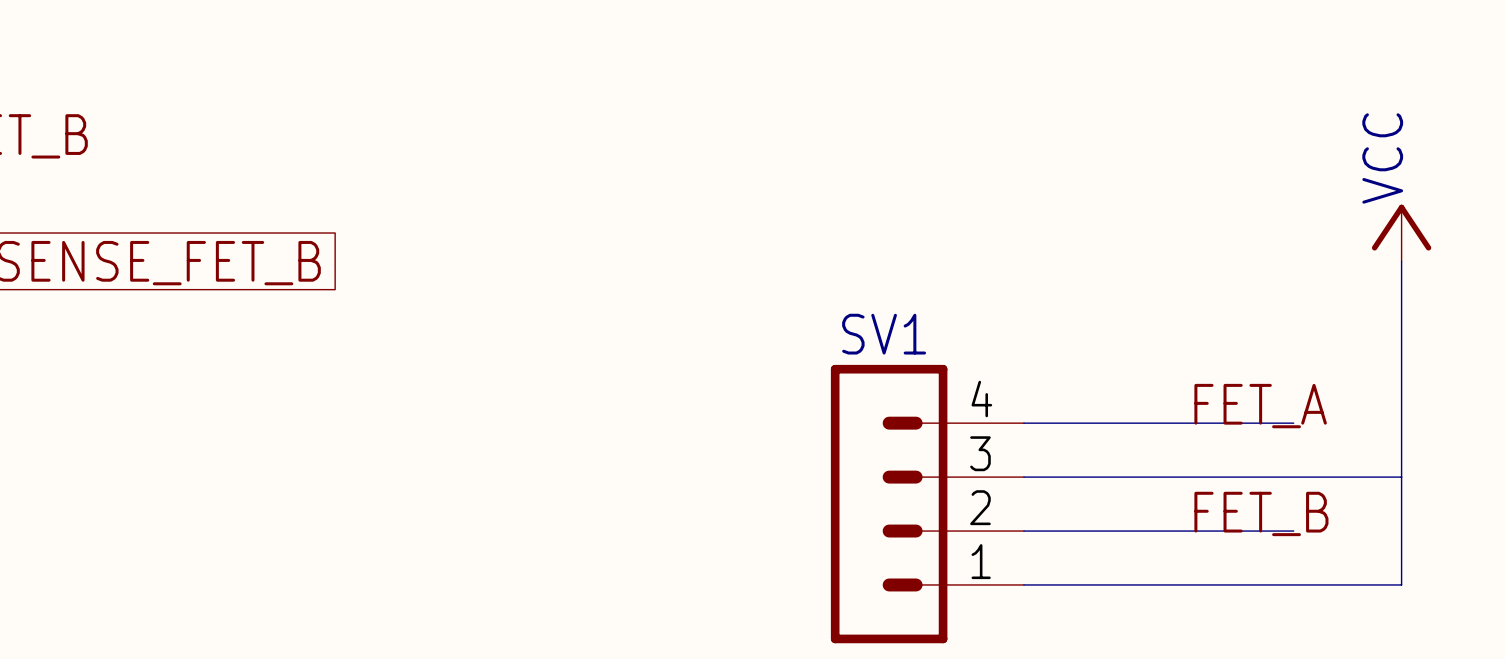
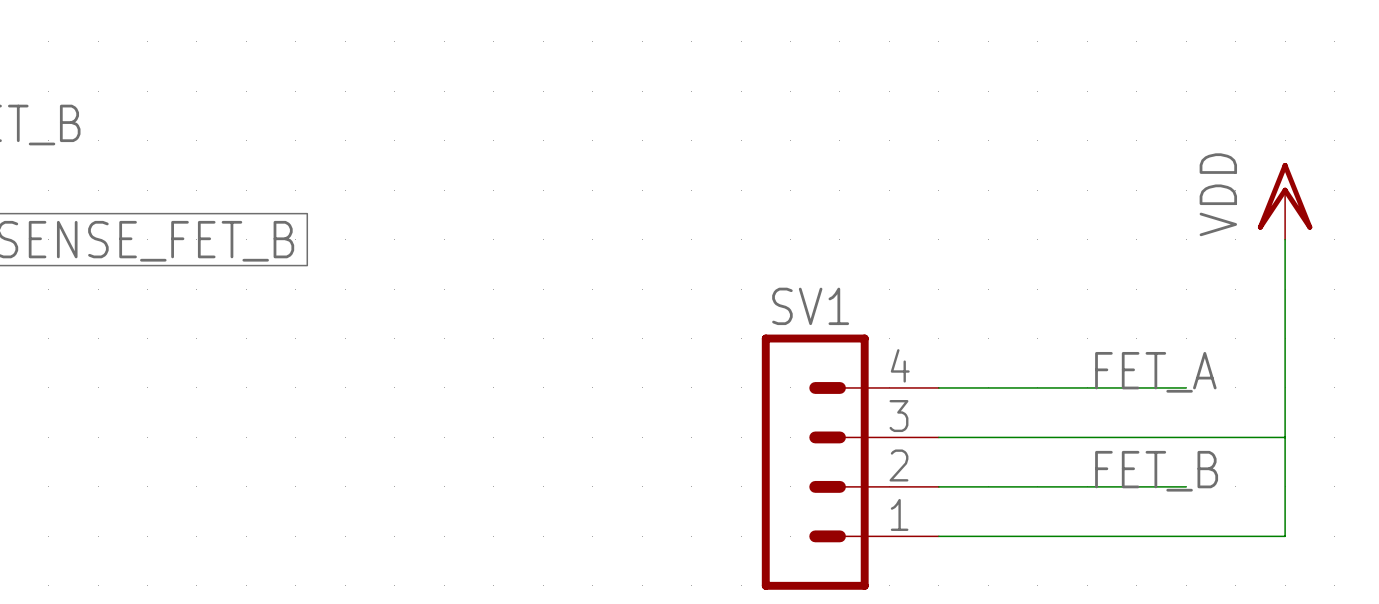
power symbol: VCC (1401, 233) -> VDD (1285, 201)

